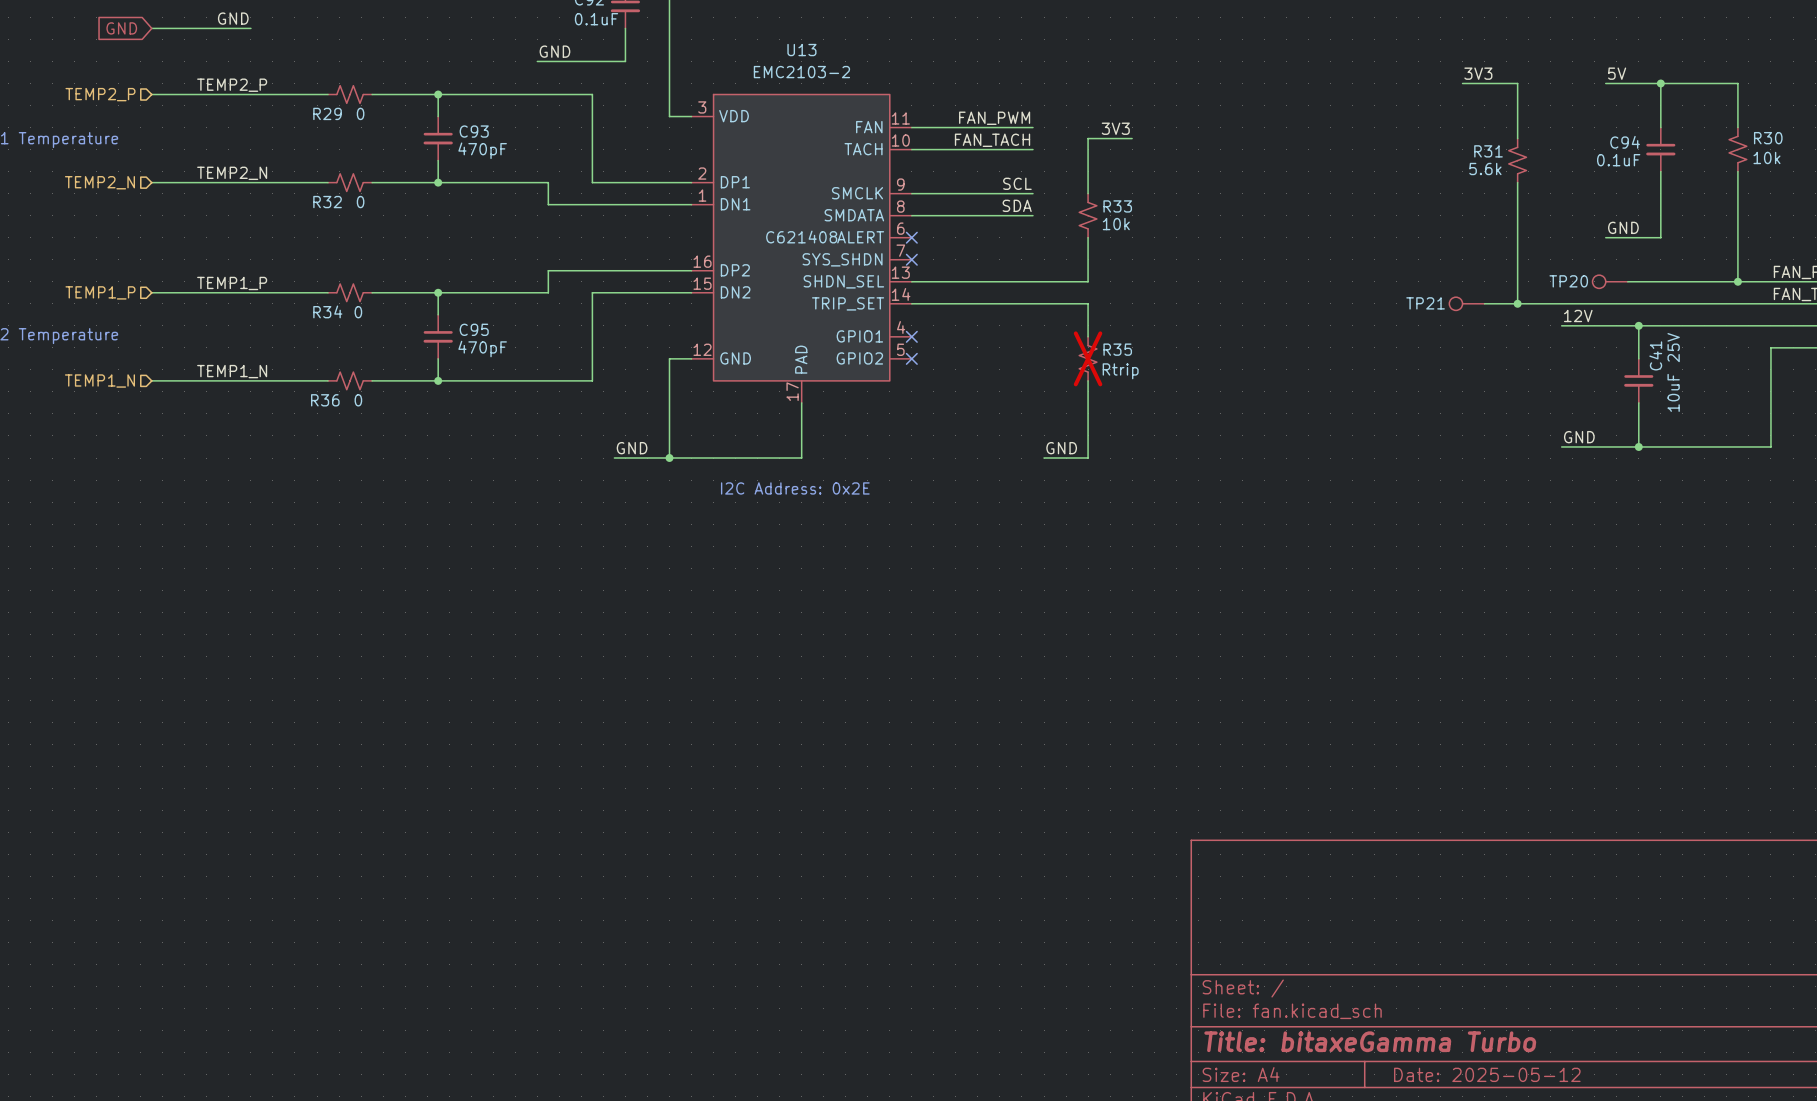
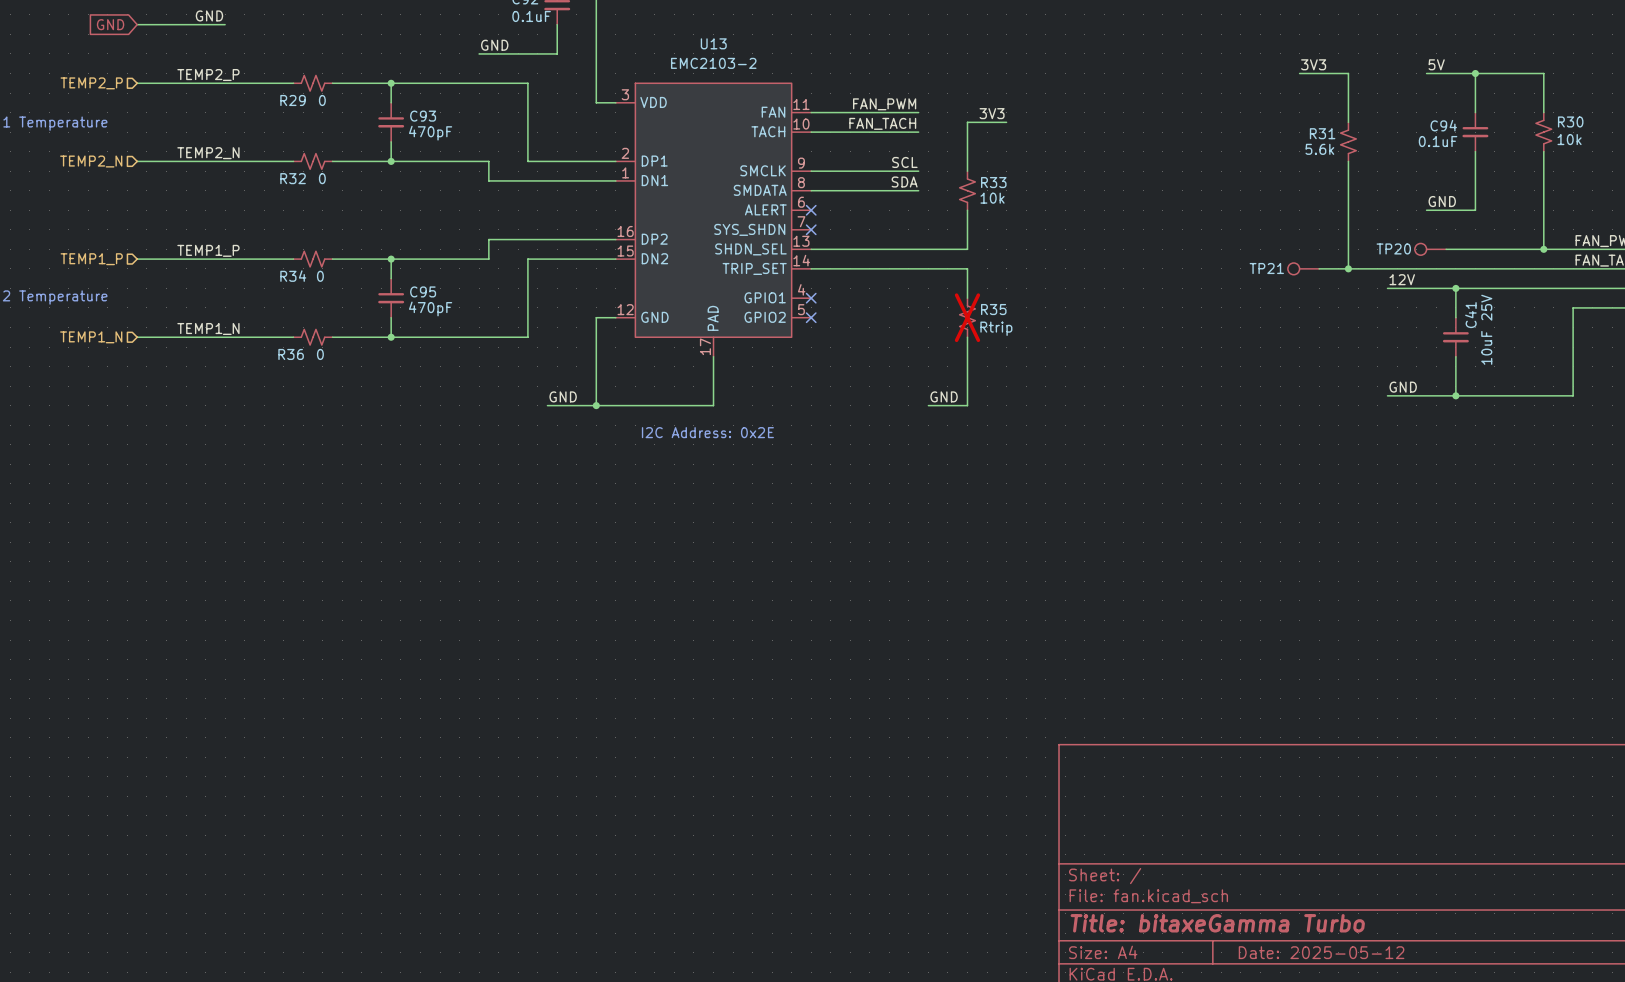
U13 text: C621408 (801, 237) -> none

